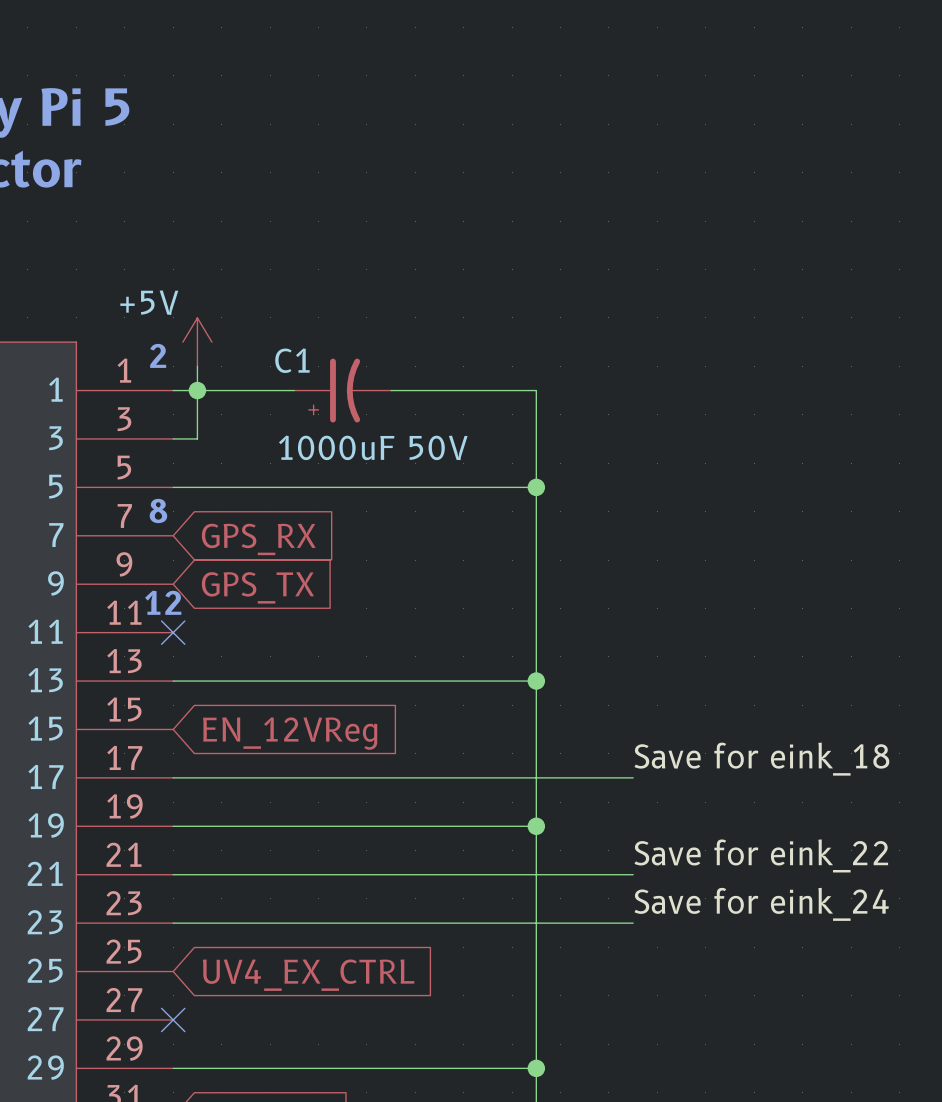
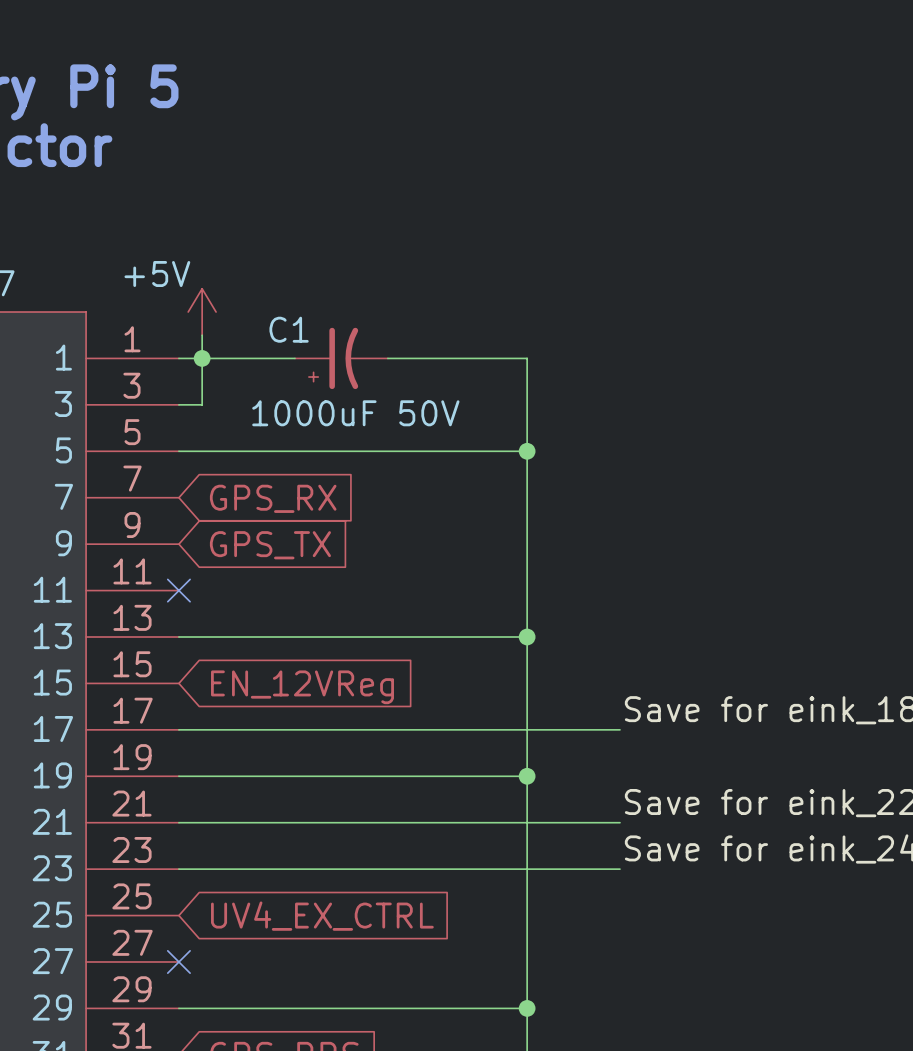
text: 2 (158, 355) -> none
text: 8 (158, 510) -> none
text: 12 (163, 602) -> none

